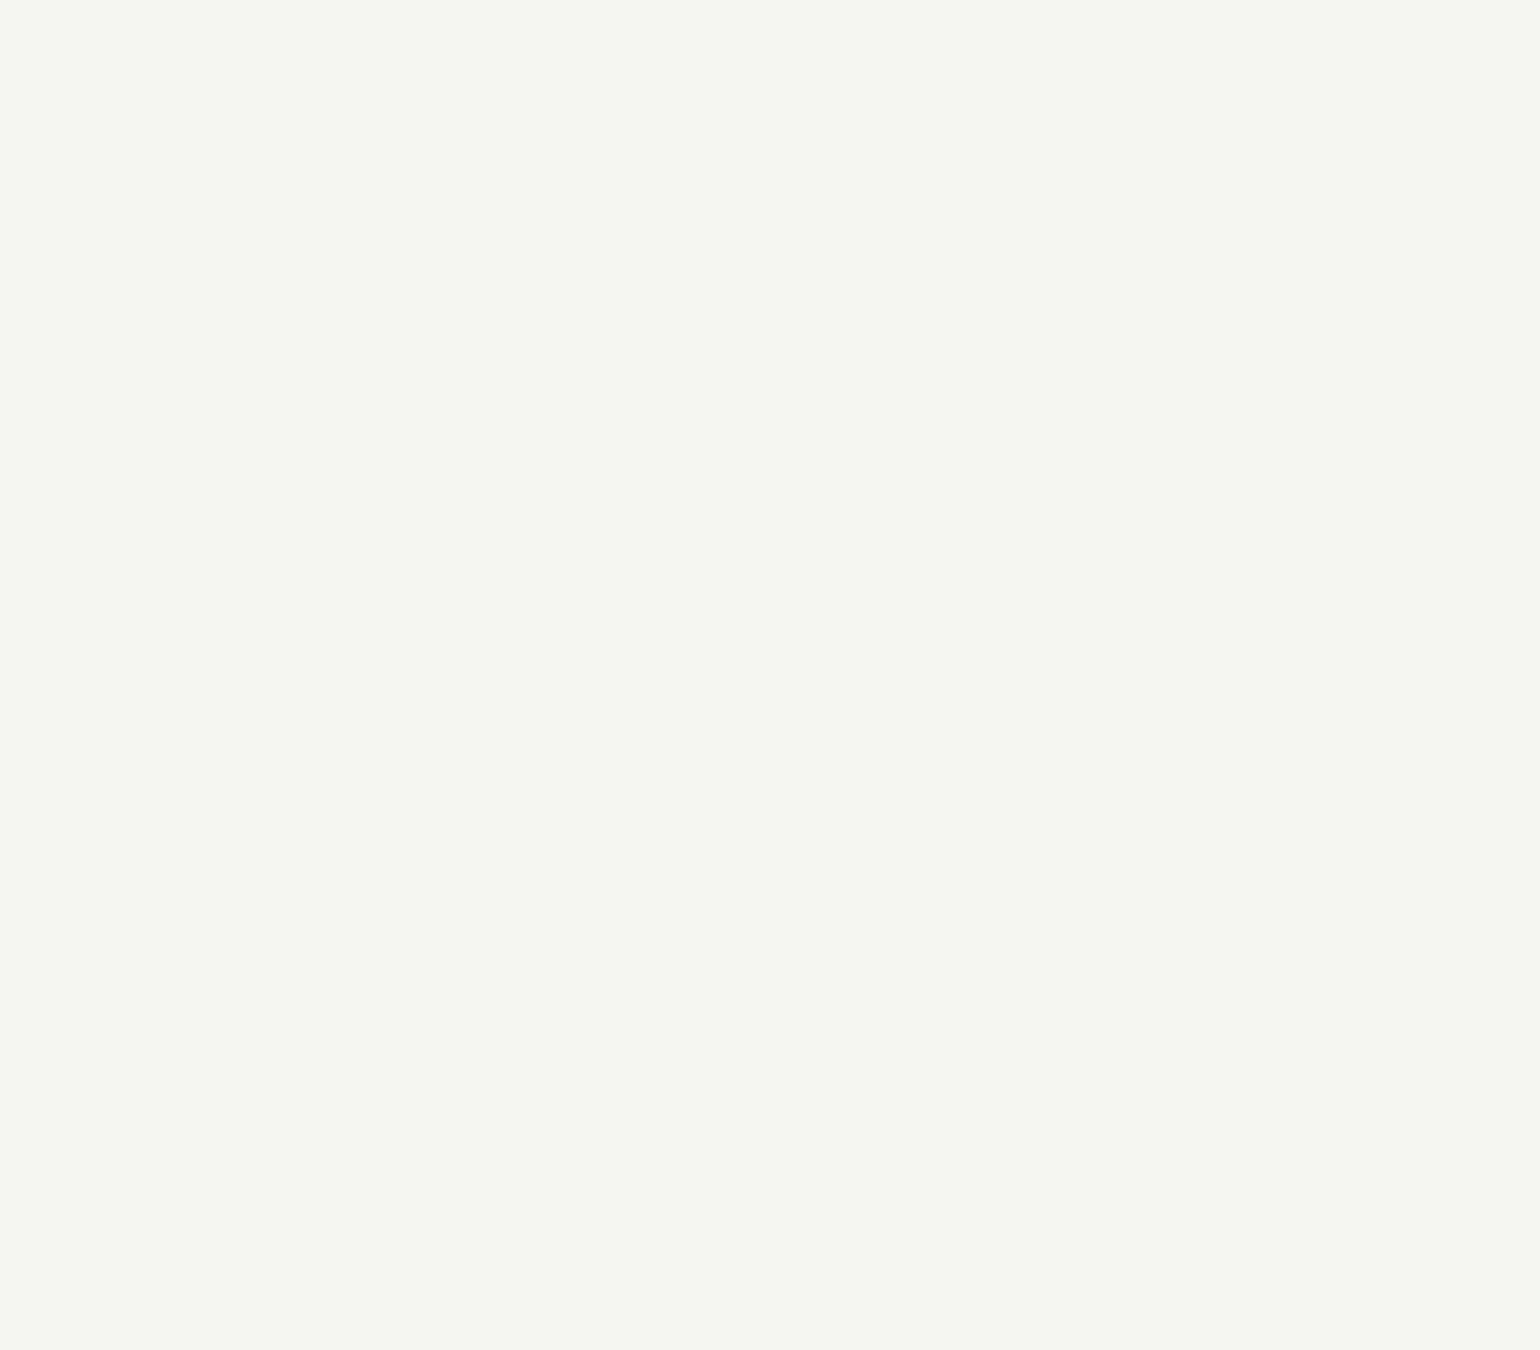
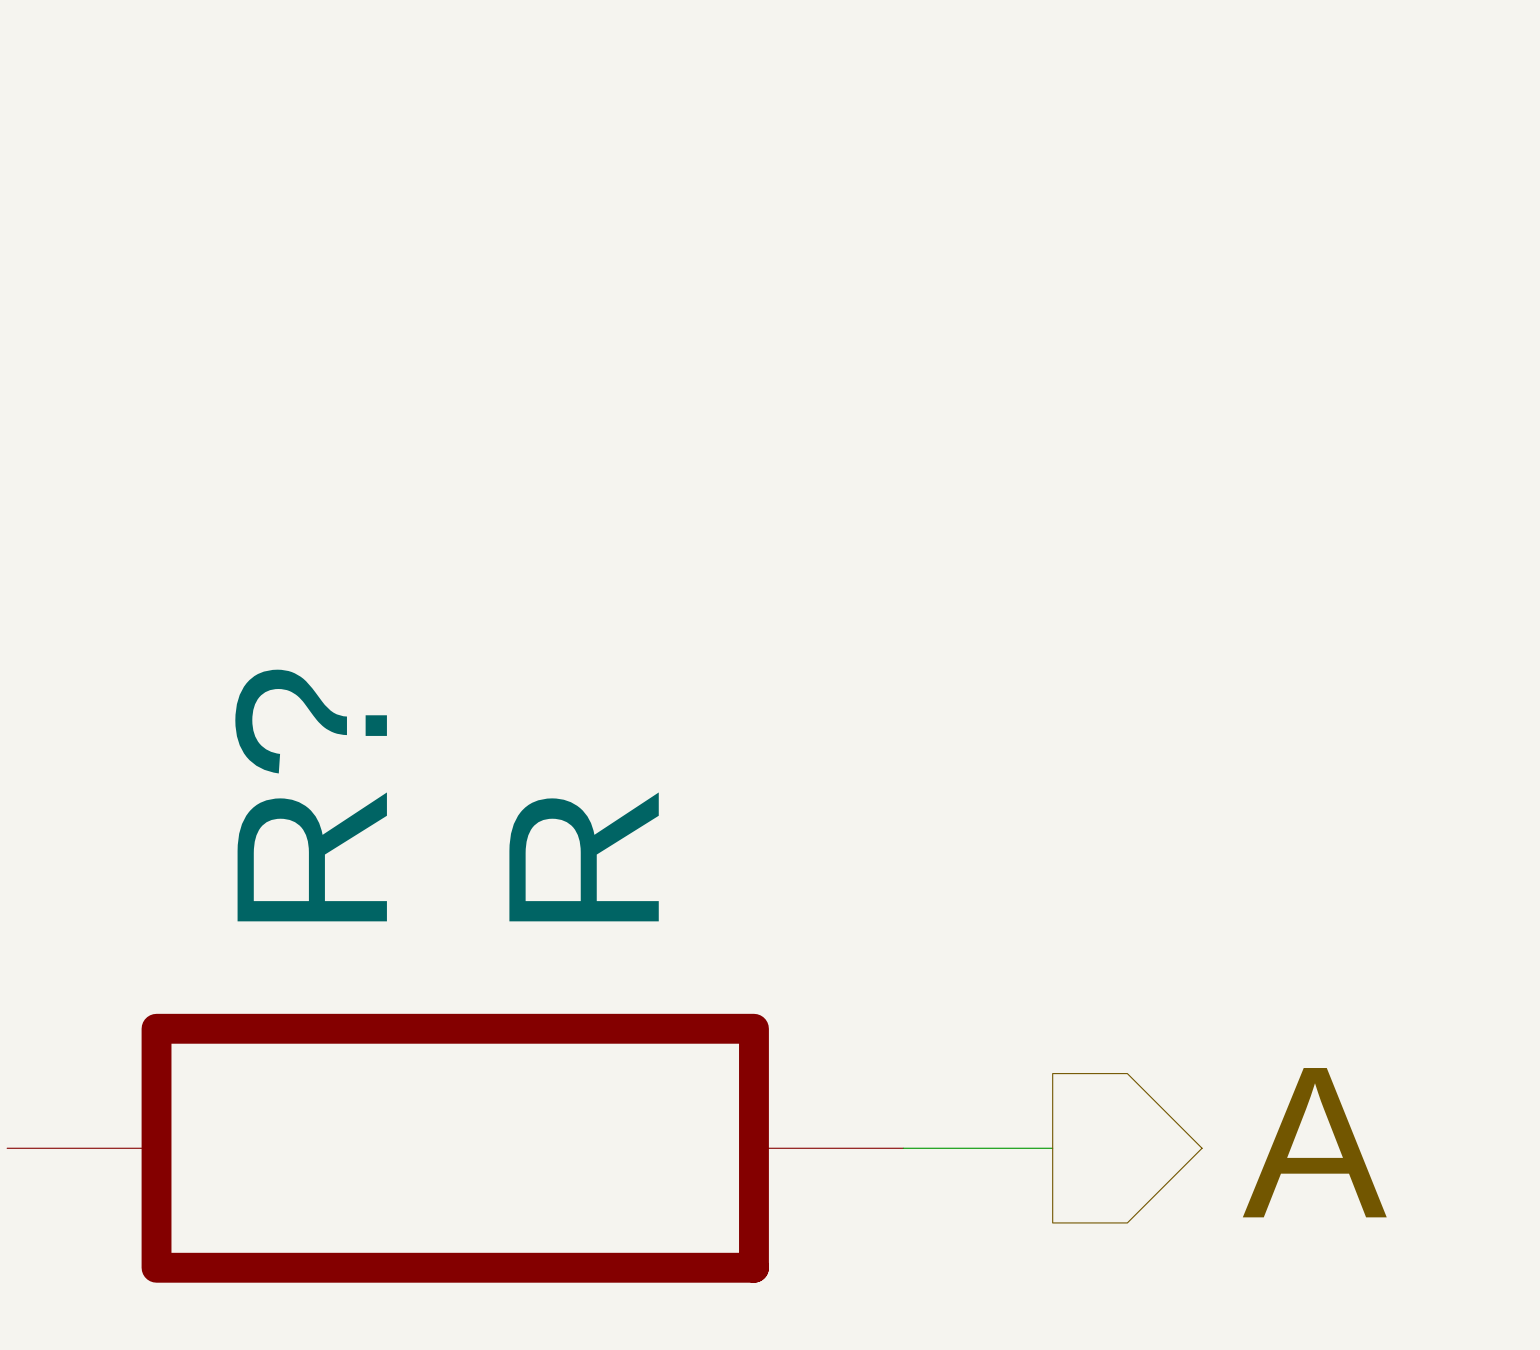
hierarchical label: none -> A (1314, 1142)
R?: none -> R (455, 1148)
wire: none -> (903, 1148) (1052, 1148)

